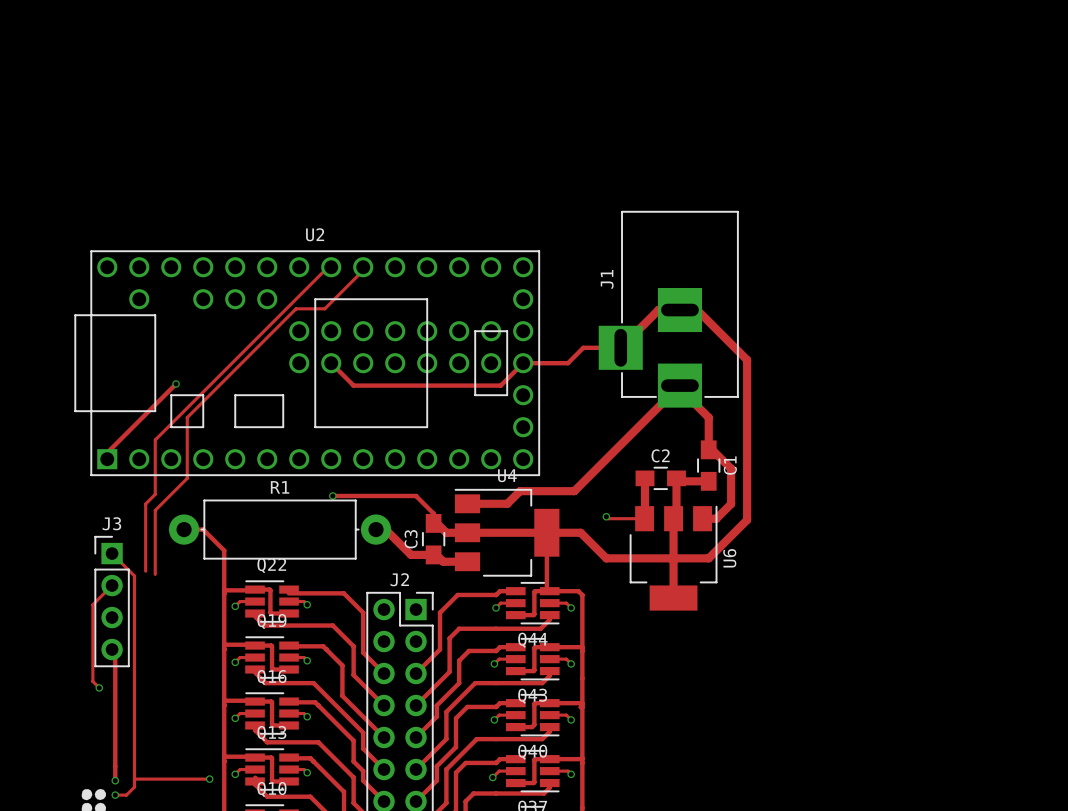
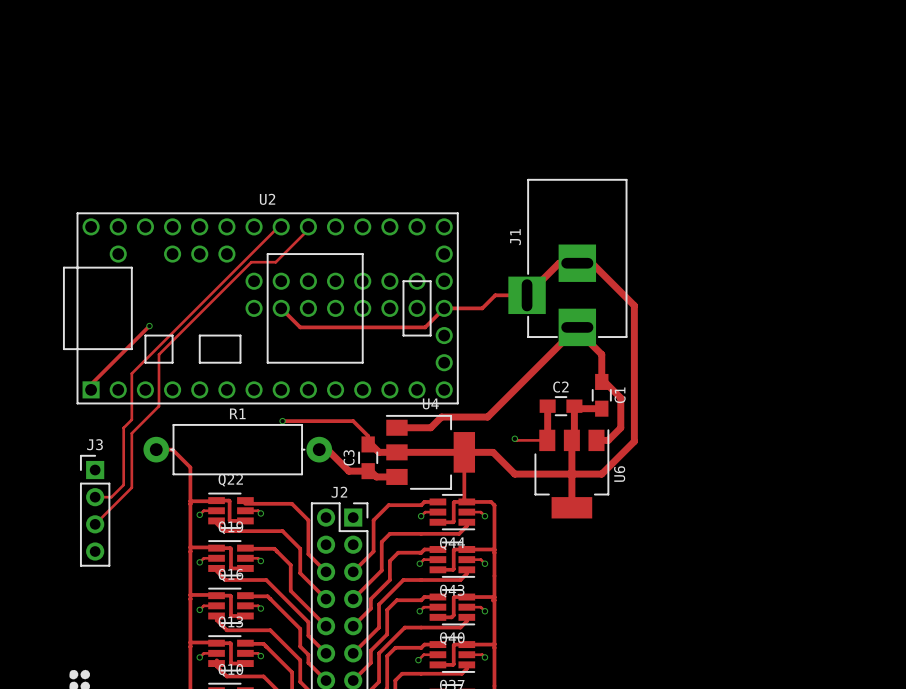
track: (112, 553) (134, 575) (134, 787) (126, 795) (115, 795) -> none
track: none -> (131, 487) (95, 524)
track: (112, 585) (92, 604) (92, 681) (99, 687) -> (95, 497) (111, 497) (123, 484)
track: (112, 649) (115, 652) (115, 780) -> none
via: (99, 687) -> none
track: (134, 779) (209, 779) -> none
via: (209, 779) -> none
via: (115, 780) -> none
via: (115, 795) -> none

